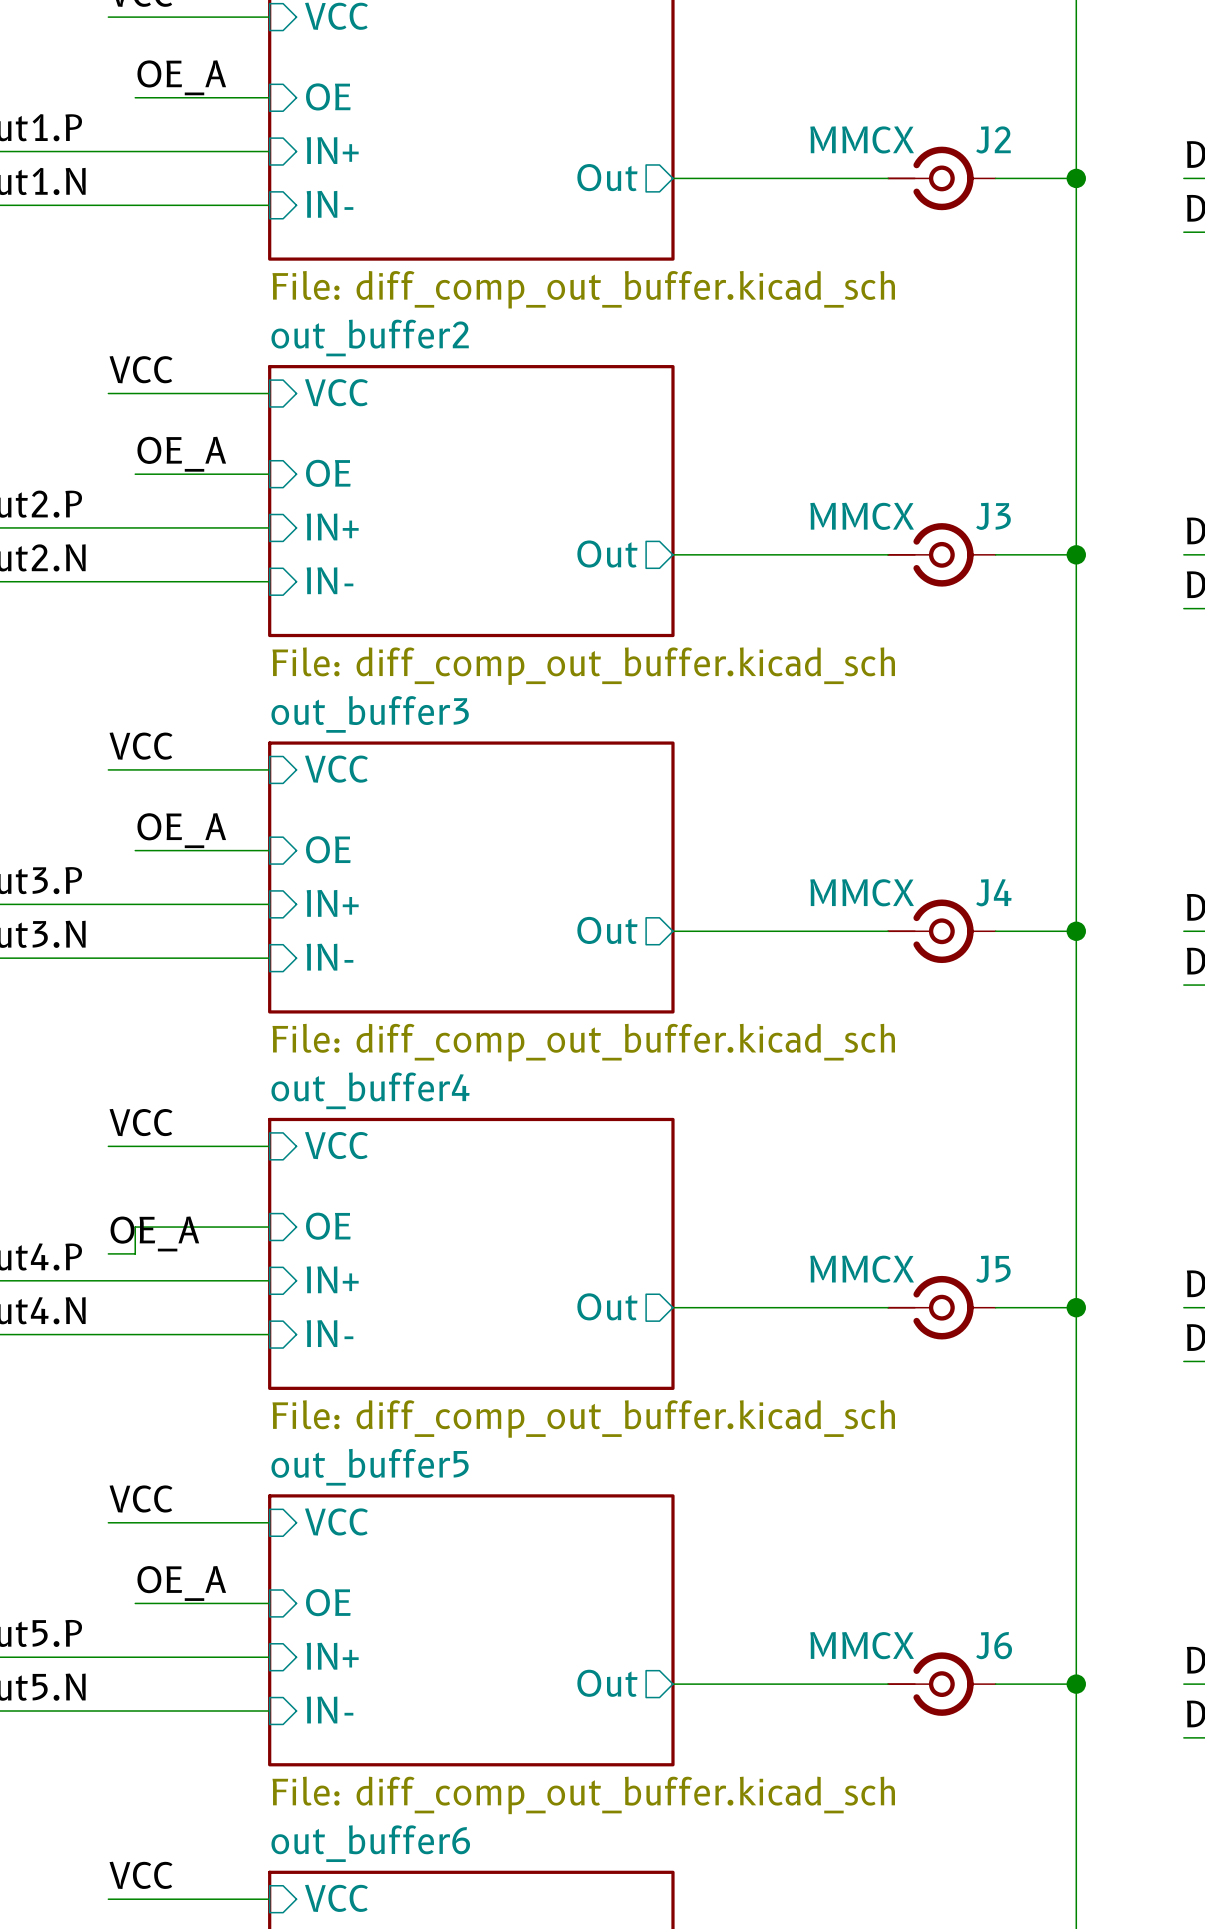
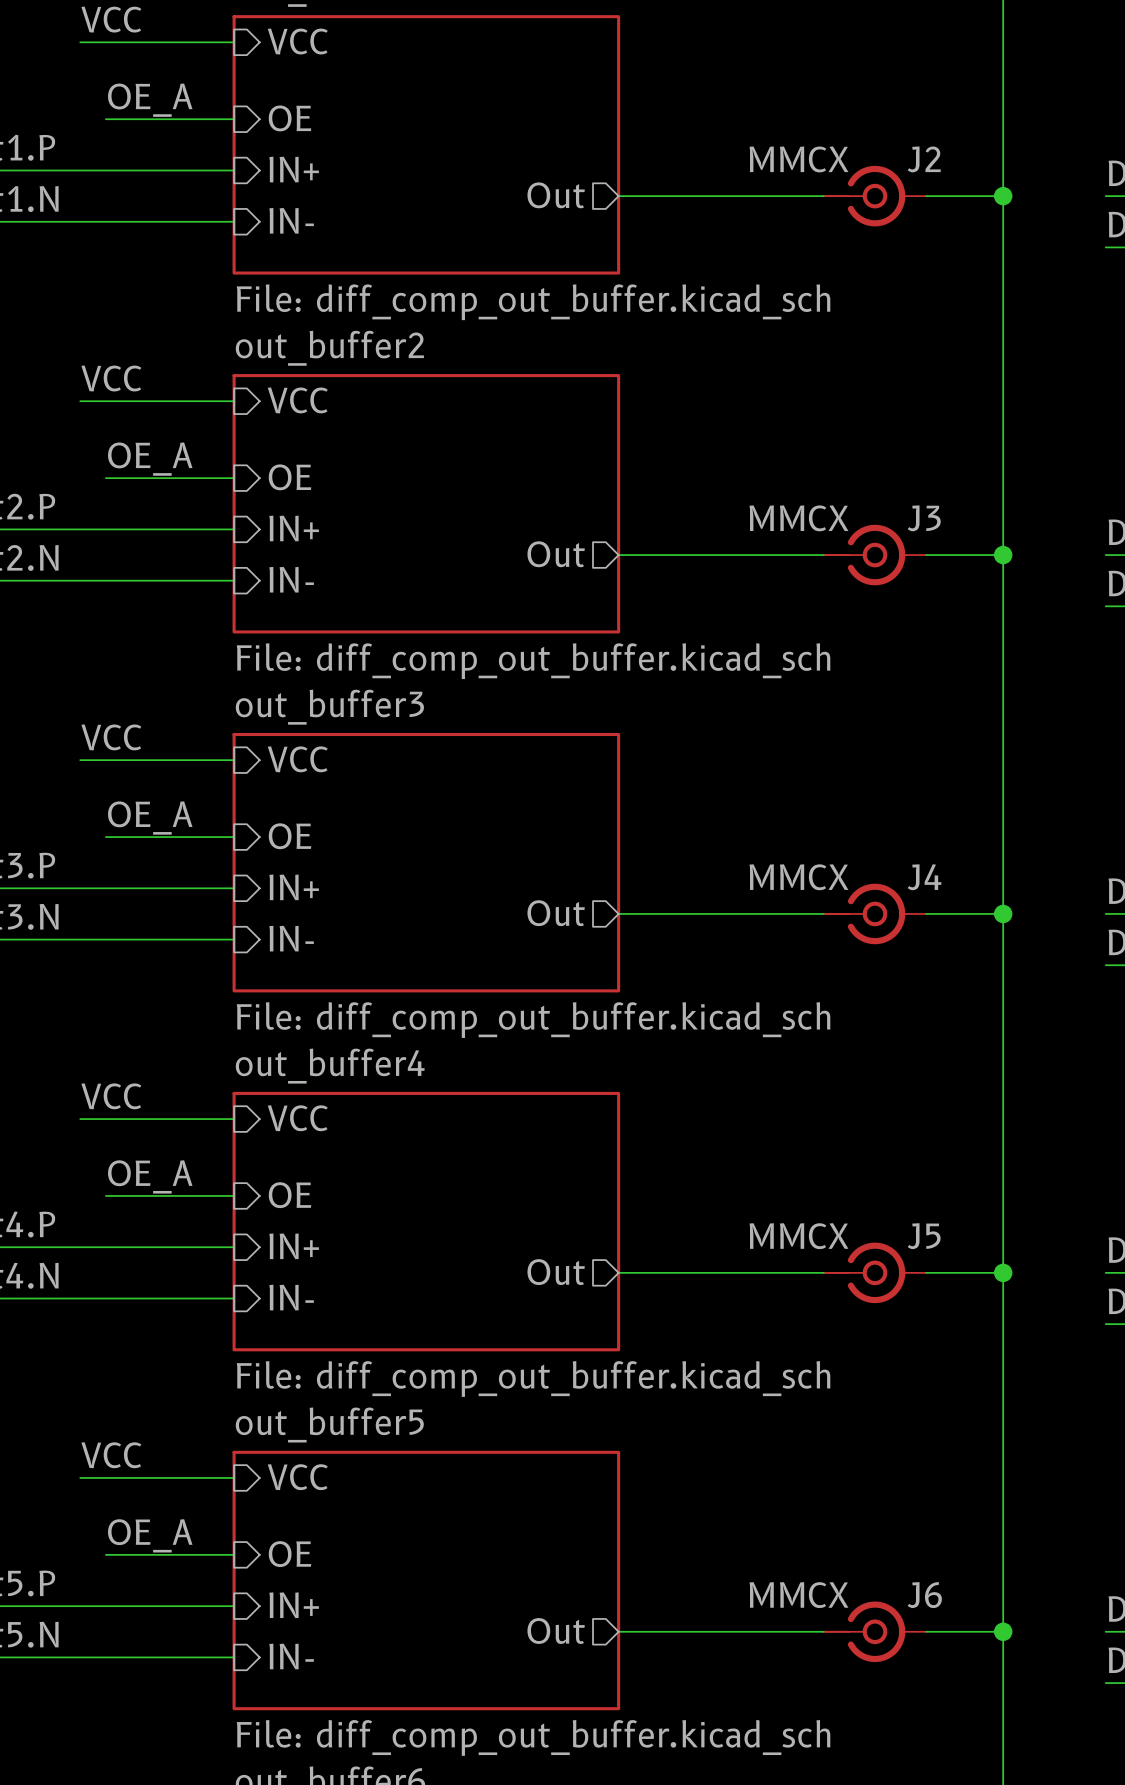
wire: (135, 1227) (135, 1253) (108, 1253) -> none
label position: OE_A (154, 1233) -> OE_A (150, 1176)

